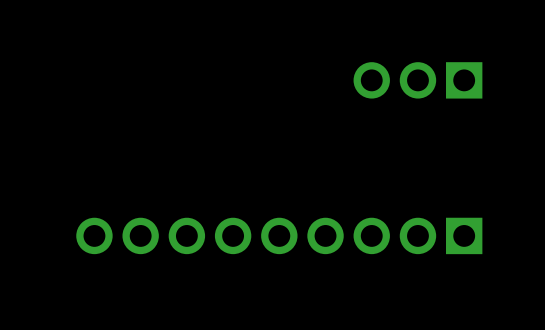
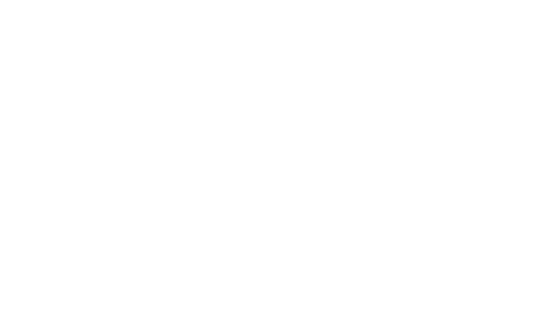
part: (417, 80) -> none
part: (279, 235) -> none

